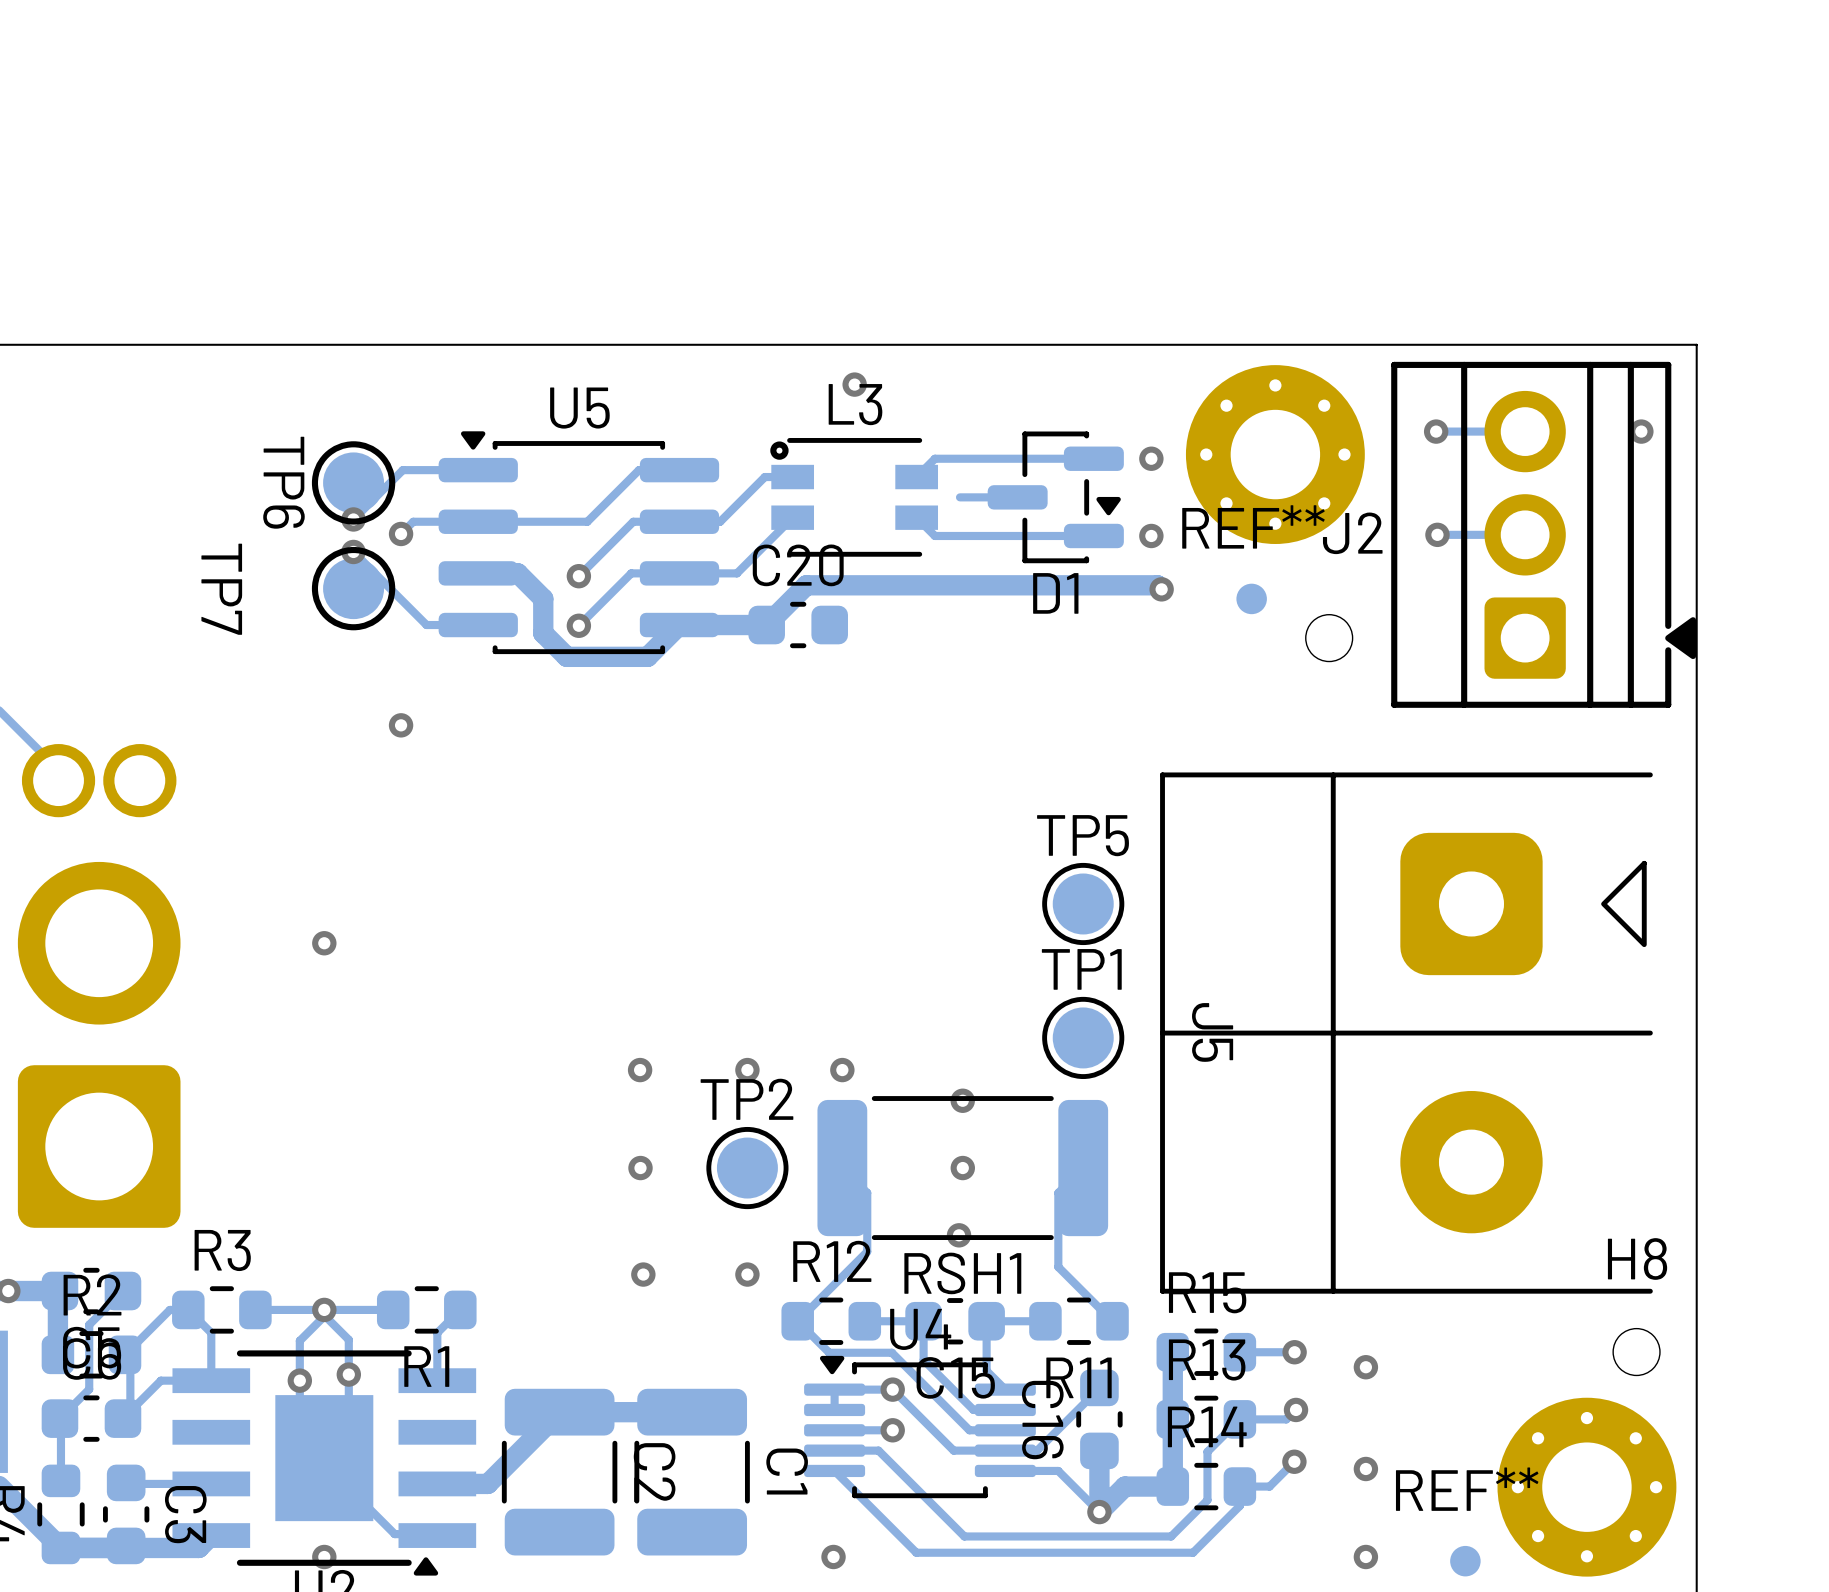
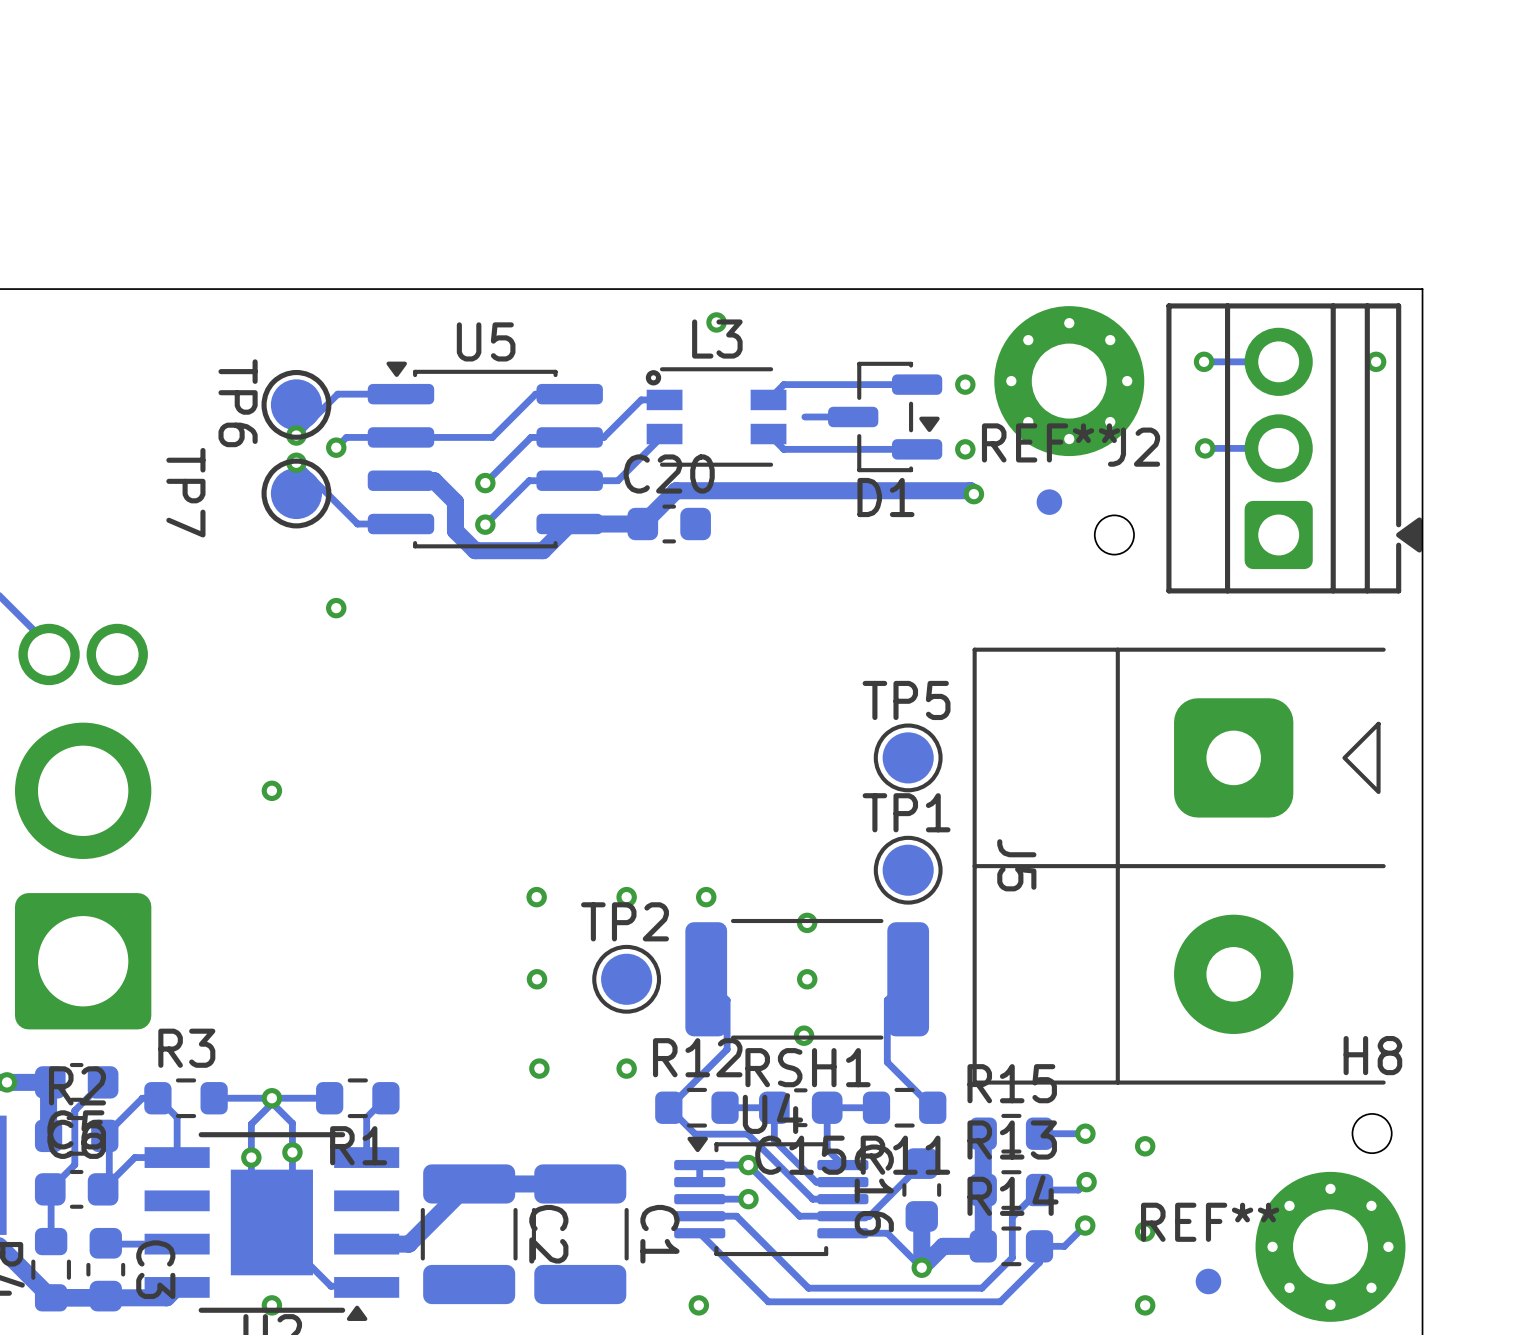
REF** position: (1465, 1561) -> (1208, 1281)

